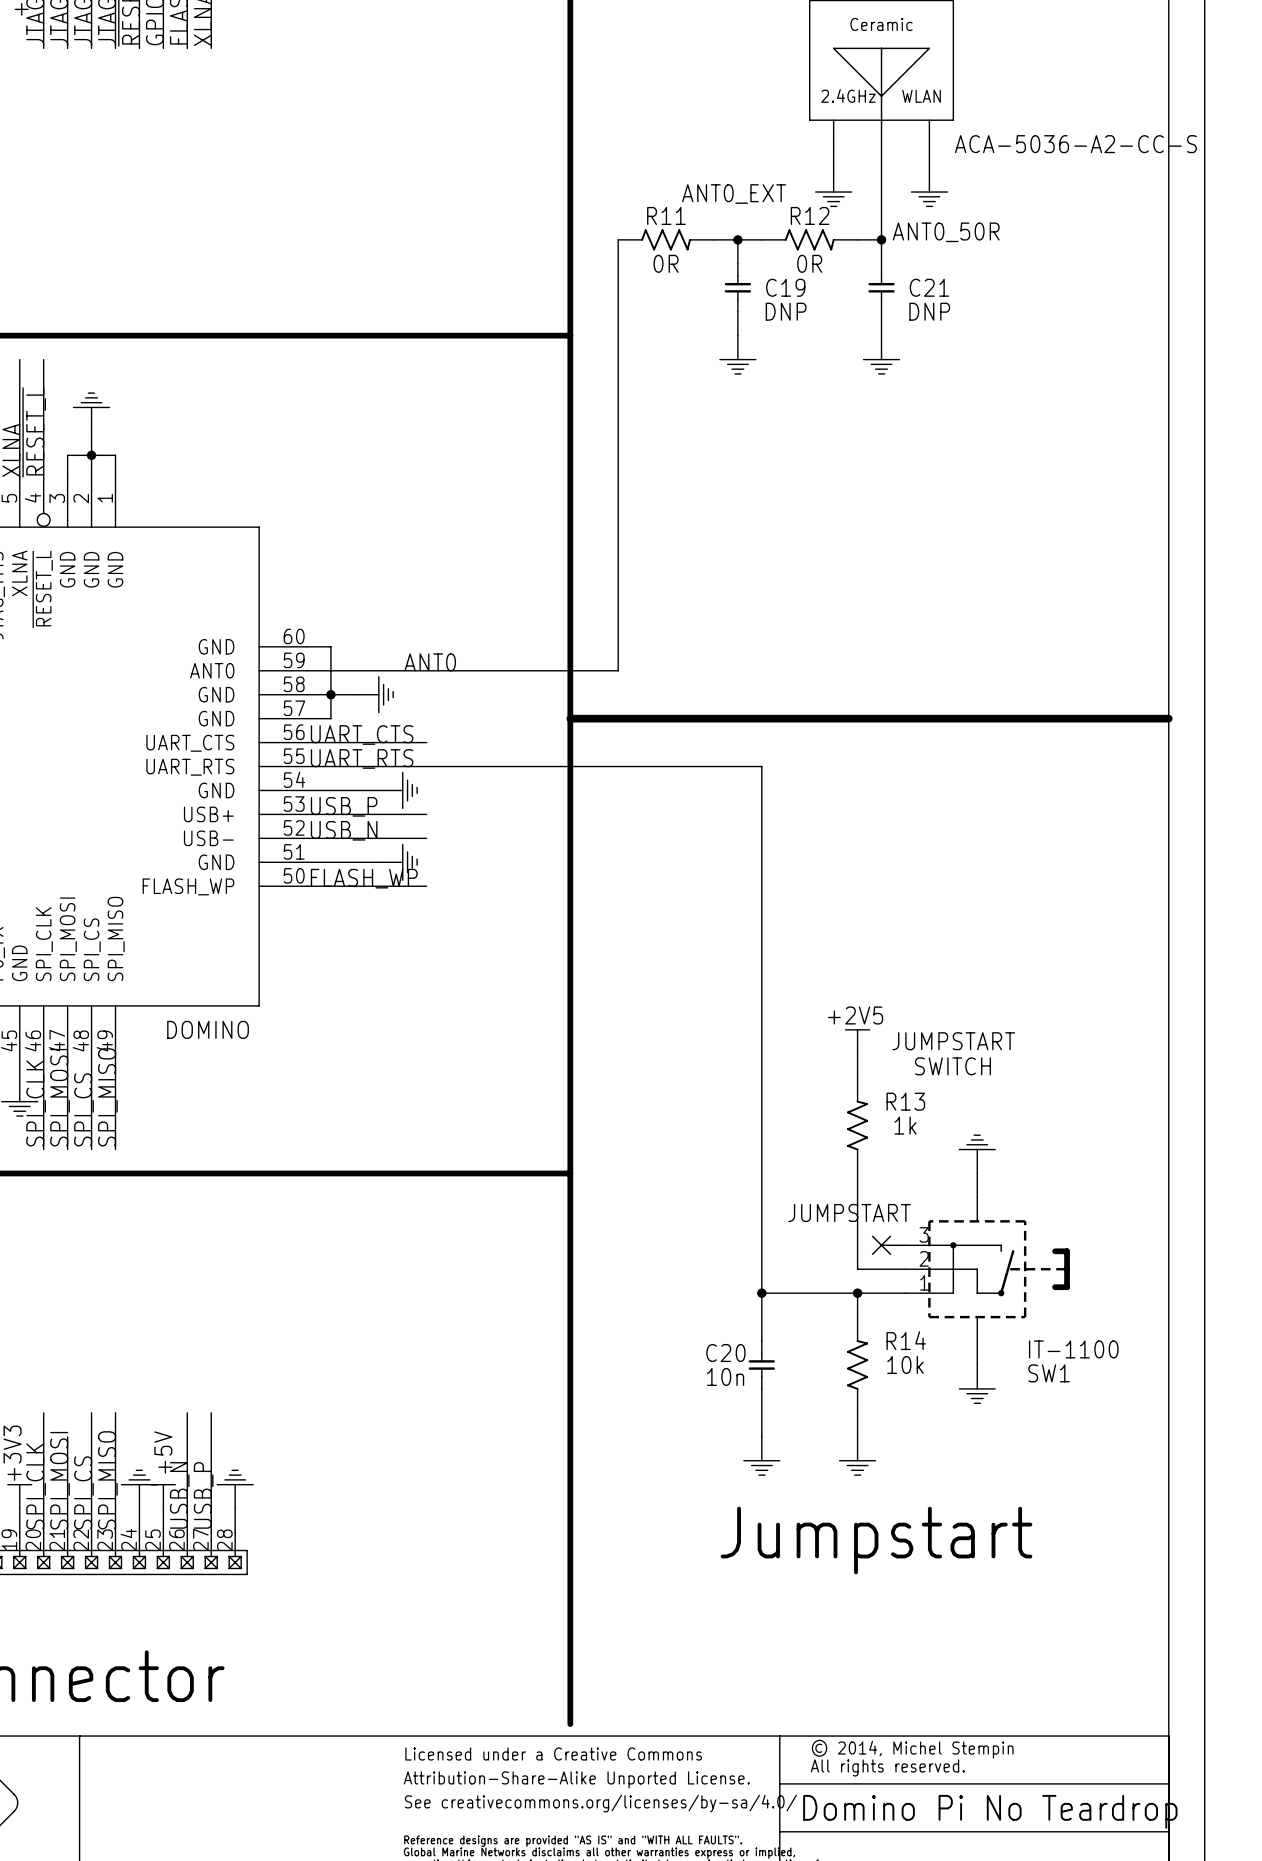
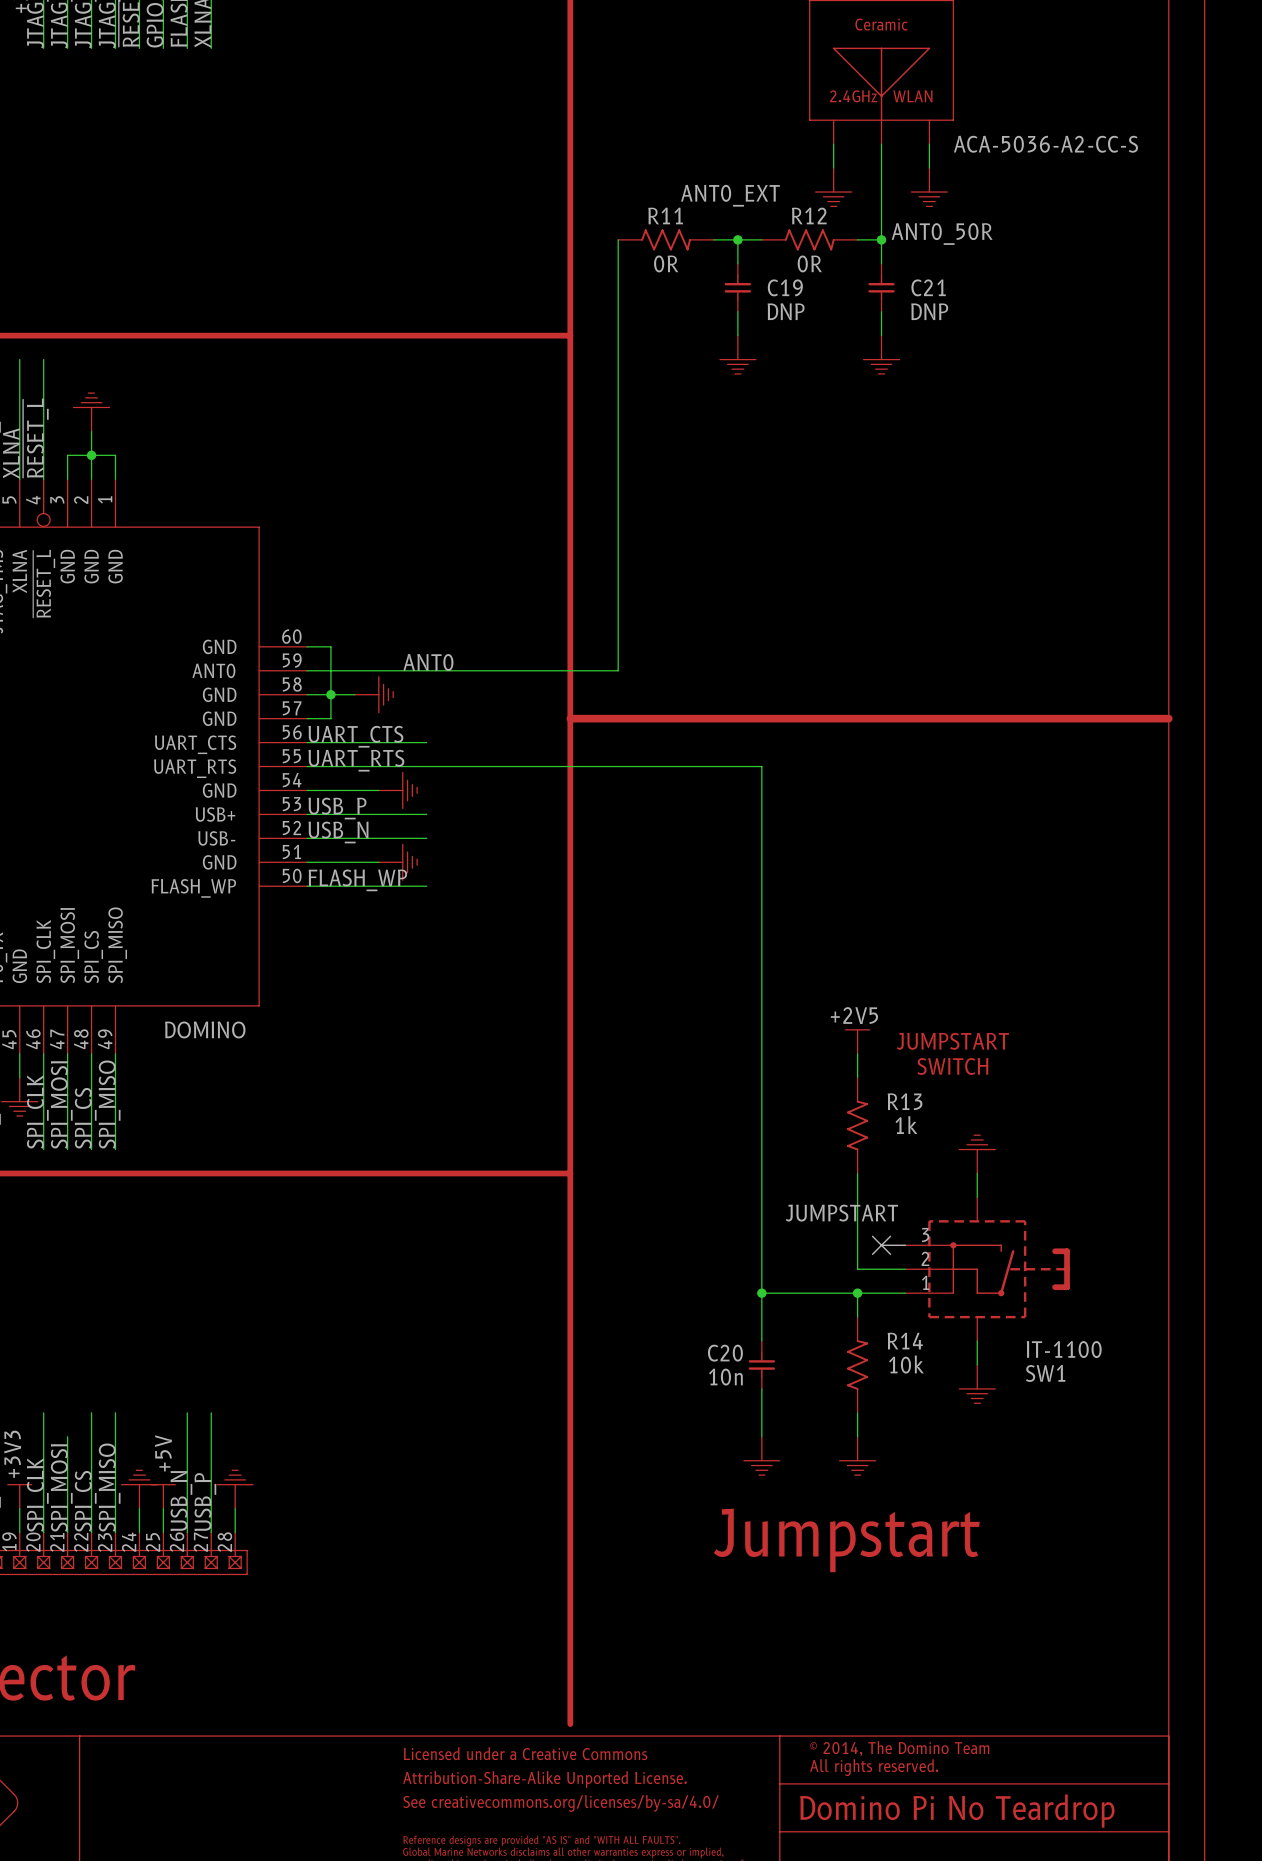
text: © 2014, Michel Stempin (912, 1749) -> © 2014, The Domino Team (899, 1748)

